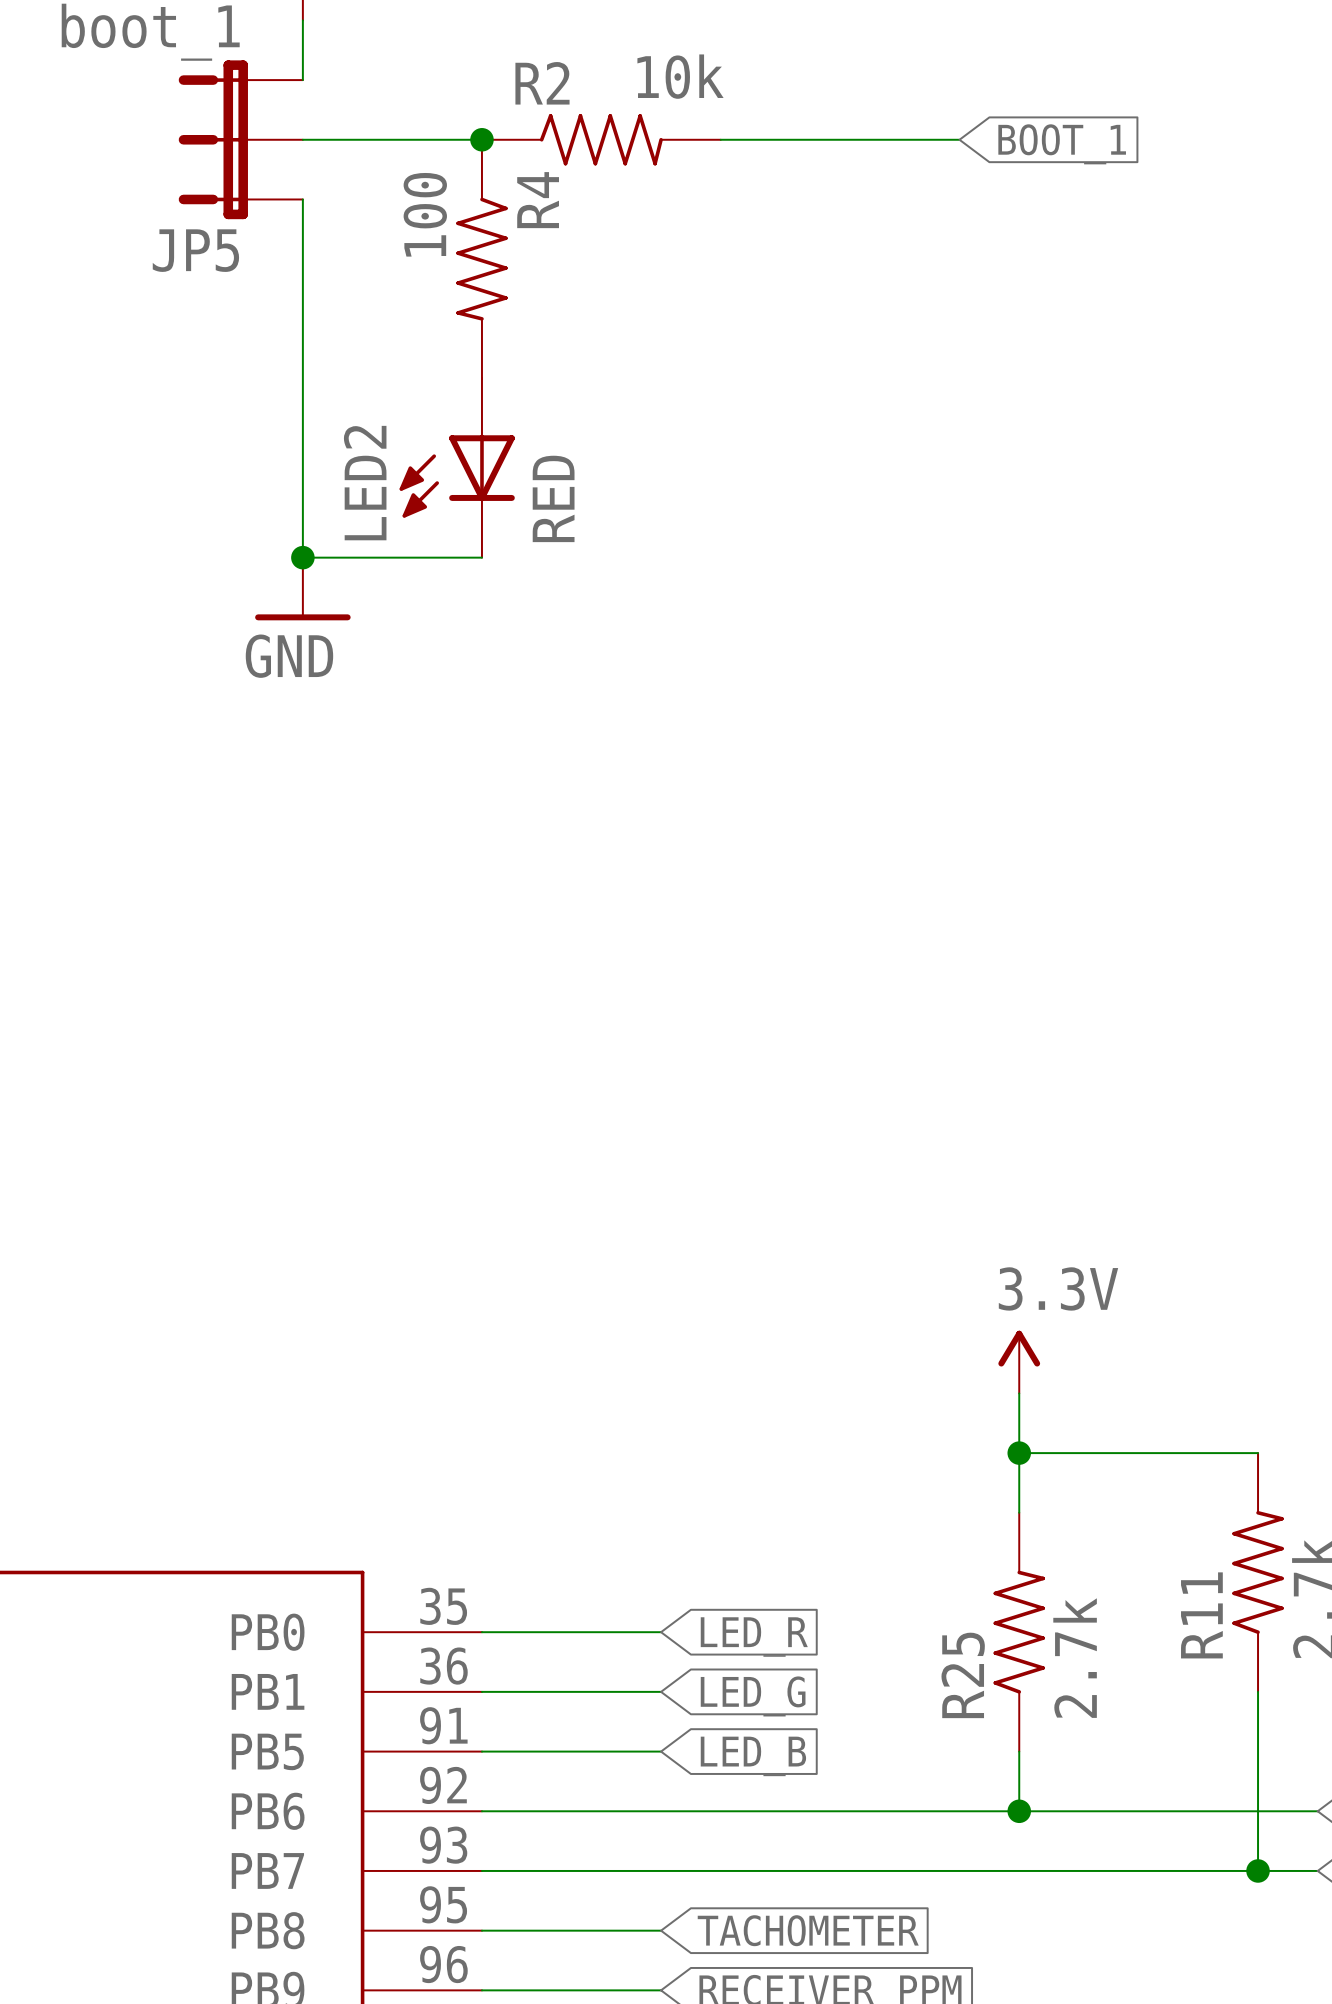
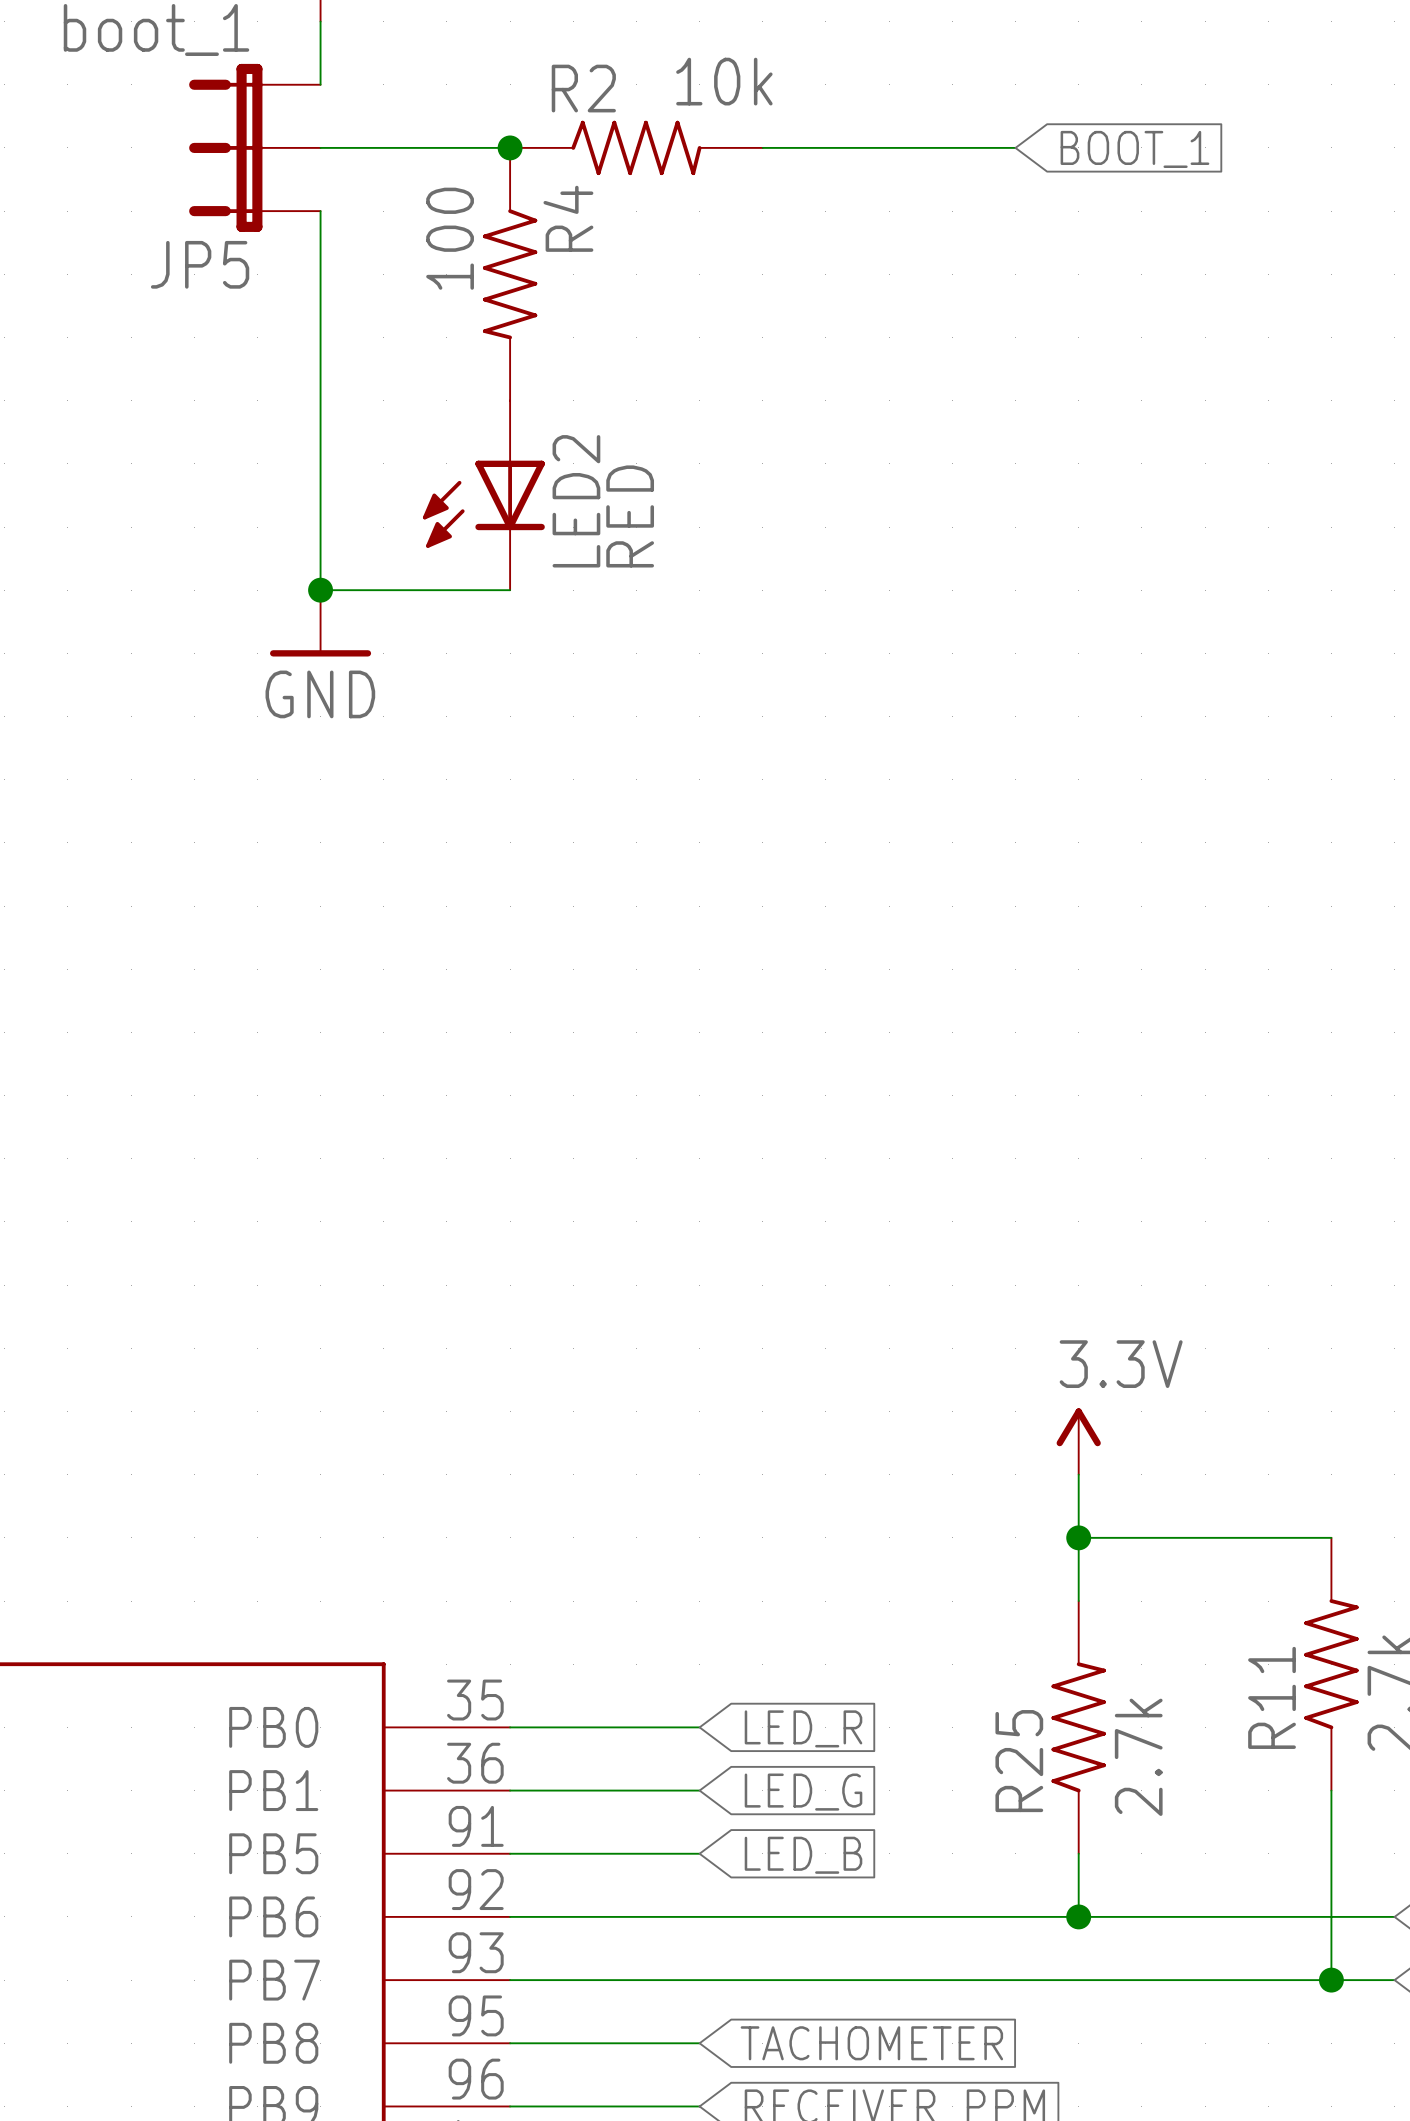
LED2 name position: LED2 (365, 483) -> LED2 (576, 501)
LED2 value position: RED (553, 498) -> RED (630, 516)

